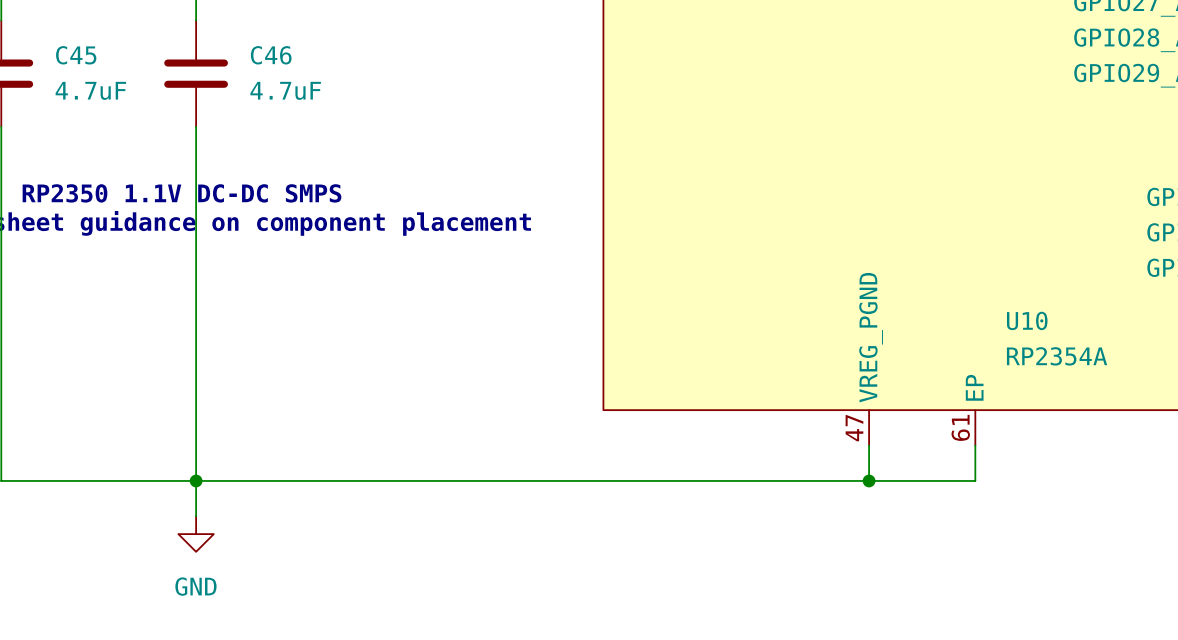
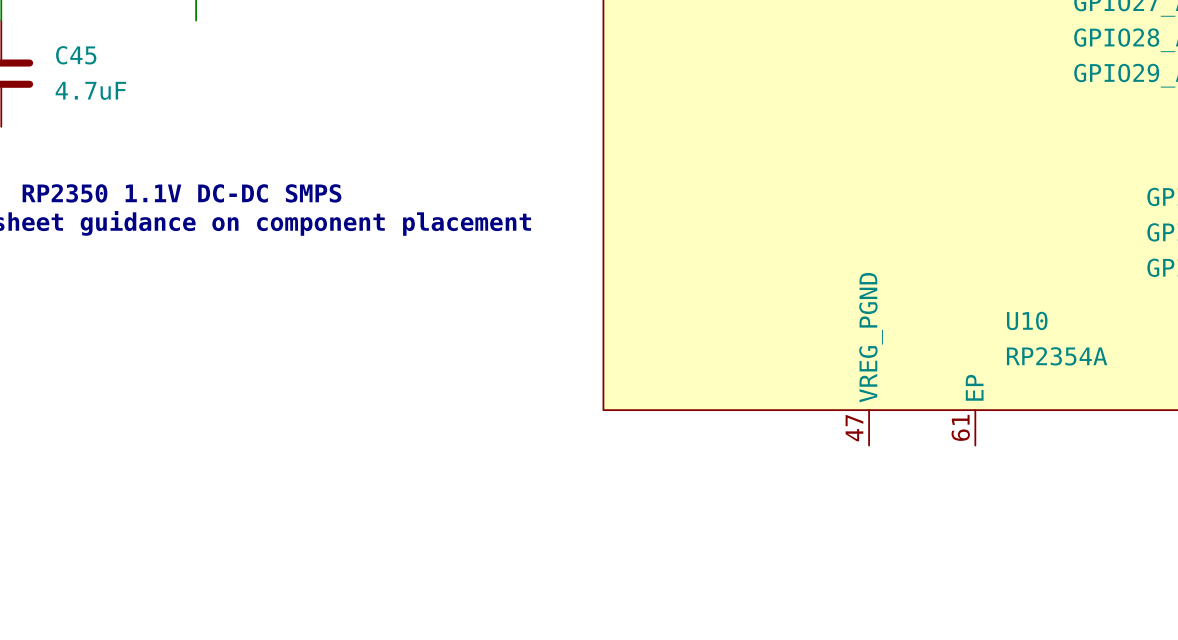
C46: 4.7uF (196, 73) -> none
wire: (1, 126) (1, 480) (975, 480) (975, 445) -> none
wire: (196, 126) (196, 516) -> none
wire: (869, 445) (869, 480) -> none
junction: (196, 480) -> none
junction: (869, 480) -> none
power symbol: GND (196, 534) -> none

